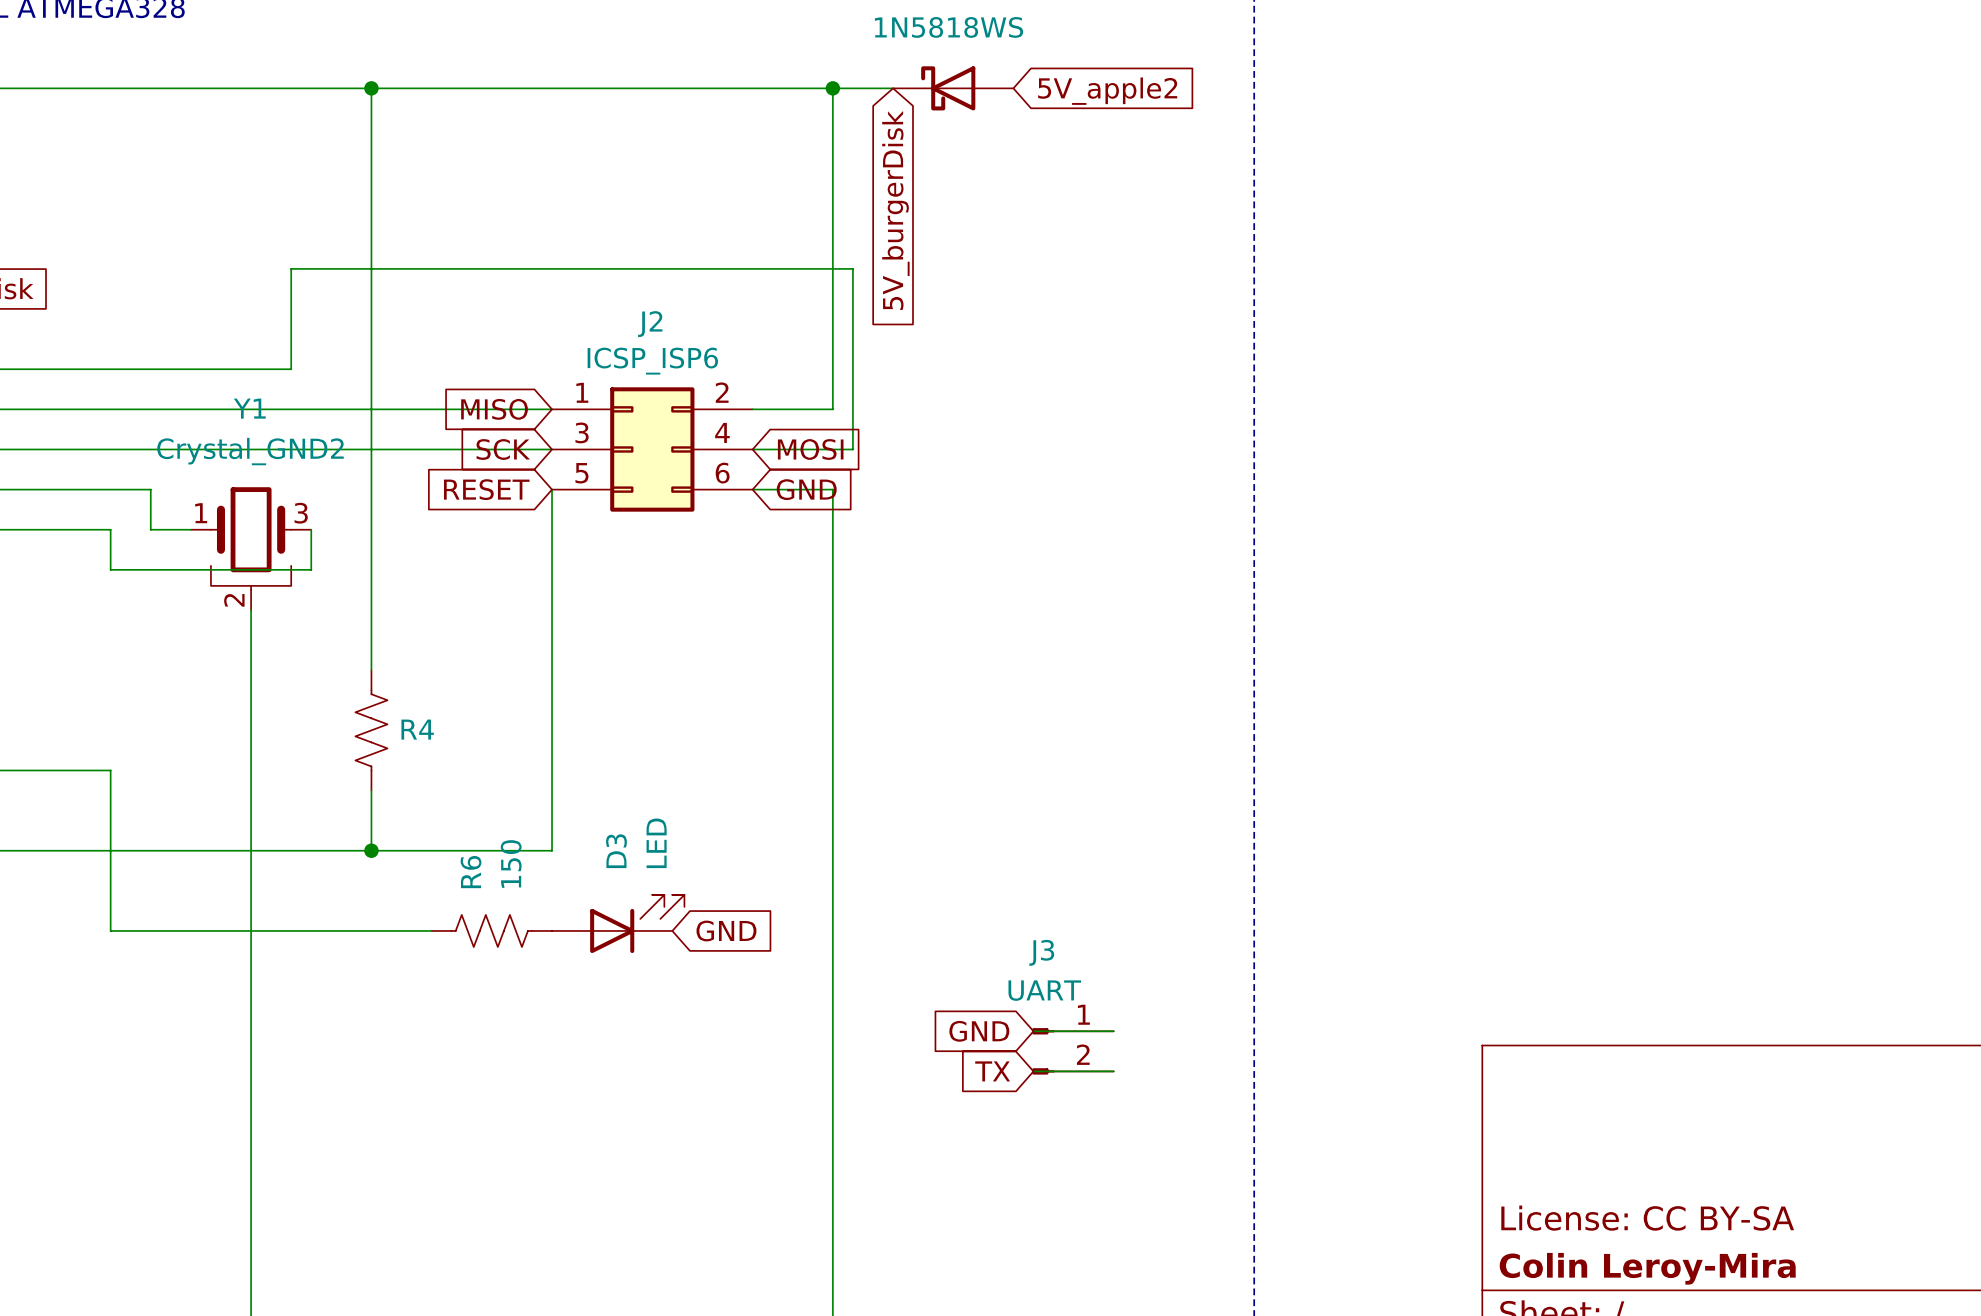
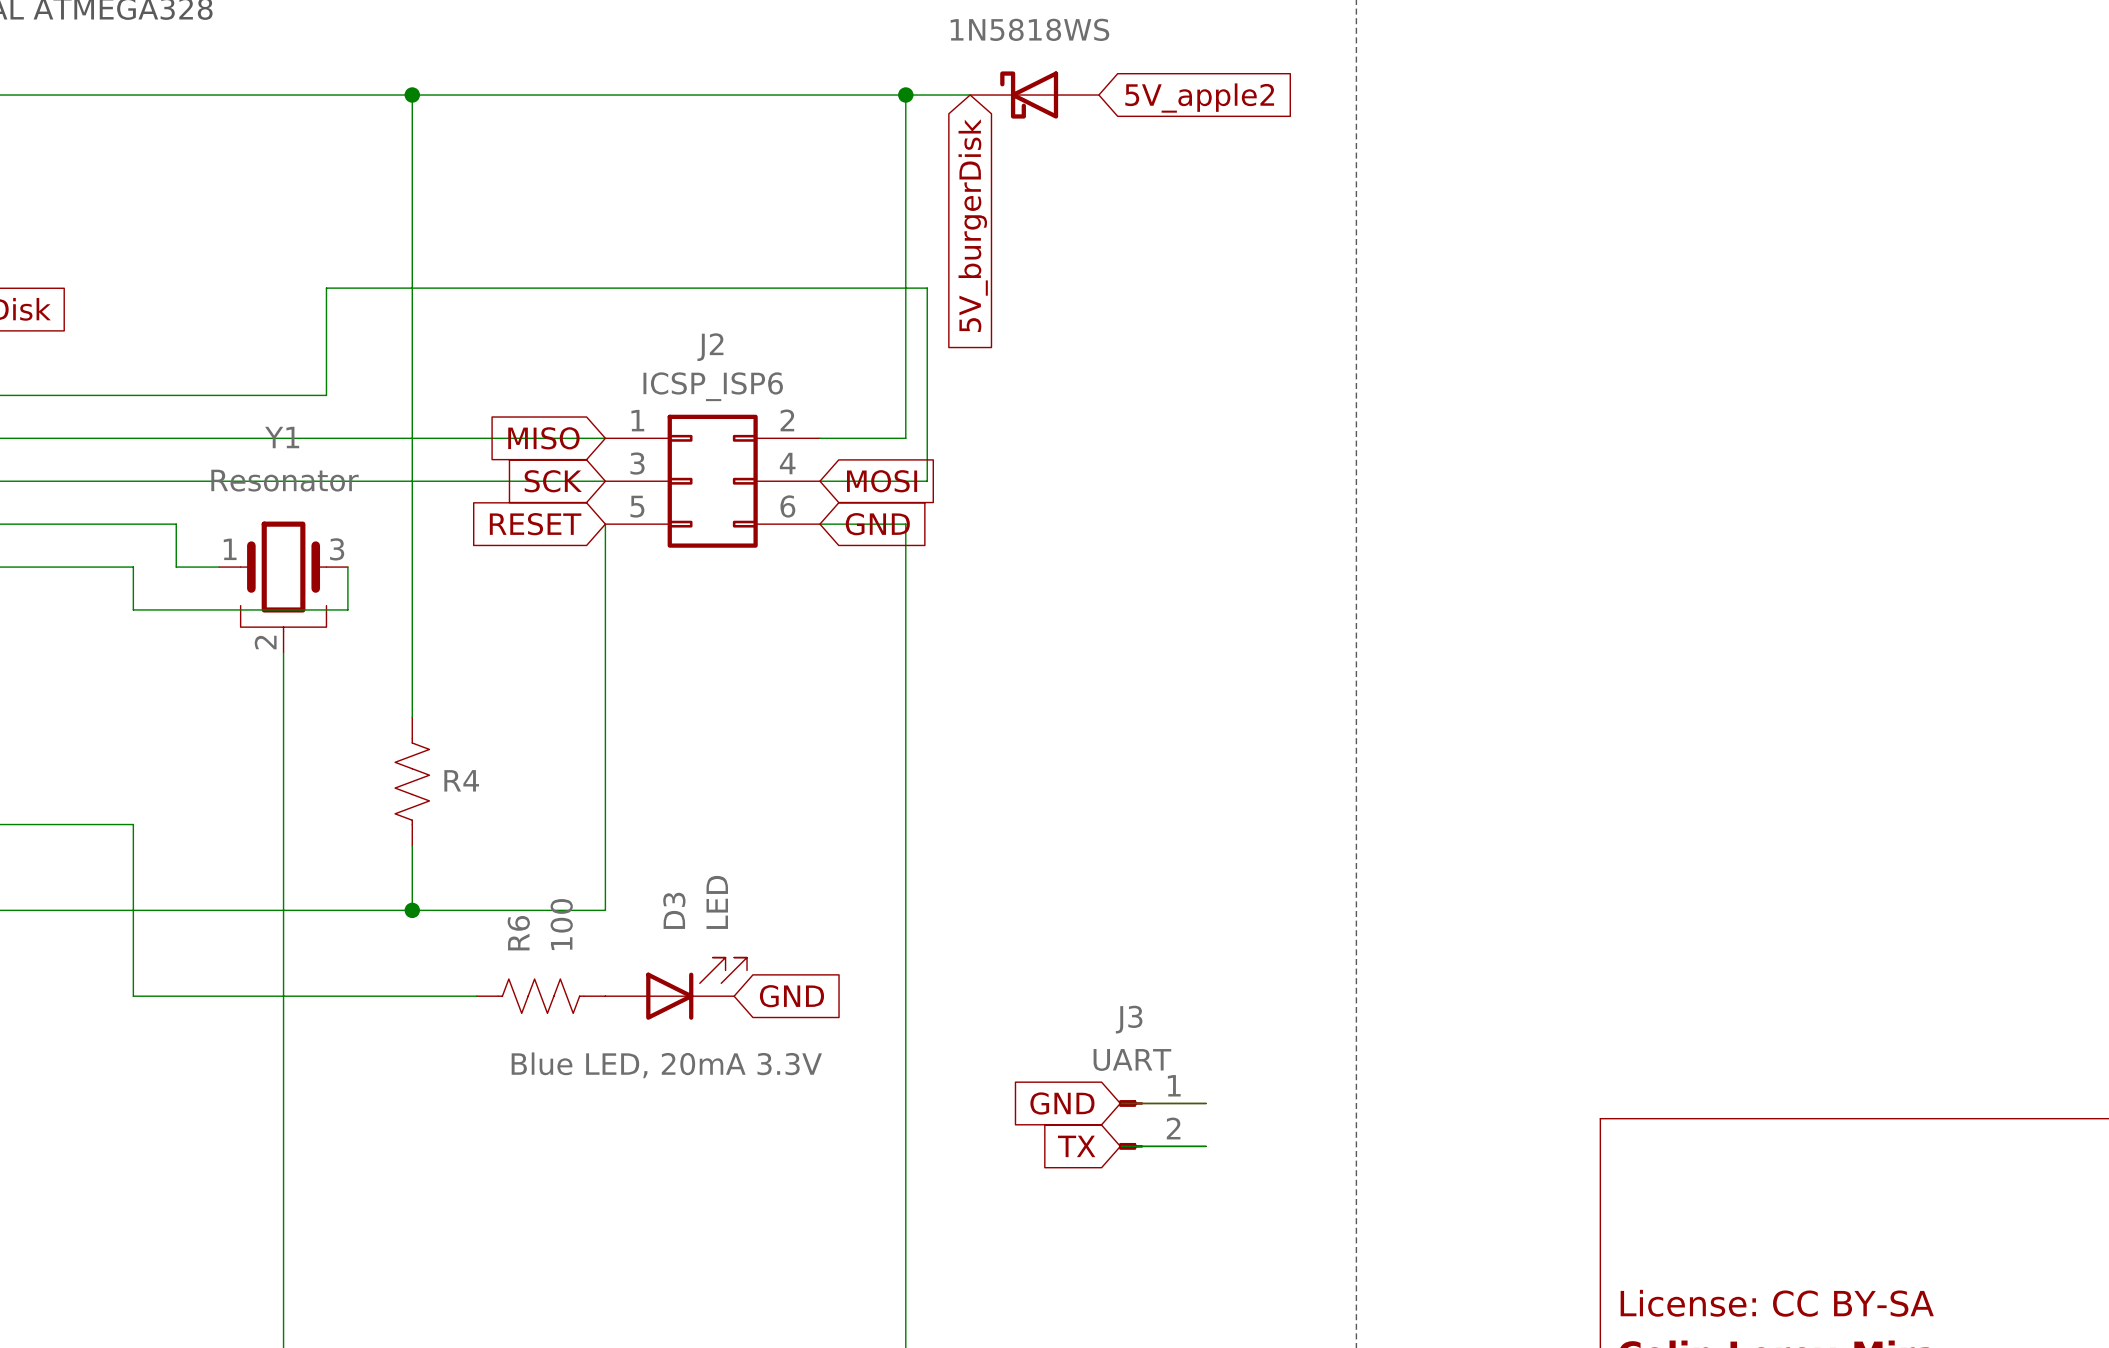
Y1 value: Crystal_GND2 (250, 451) -> Resonator (284, 480)
R6 value: 150 (511, 863) -> 100 (561, 924)
D3 text: none -> Blue LED, 20mA 3.3V (666, 1065)

